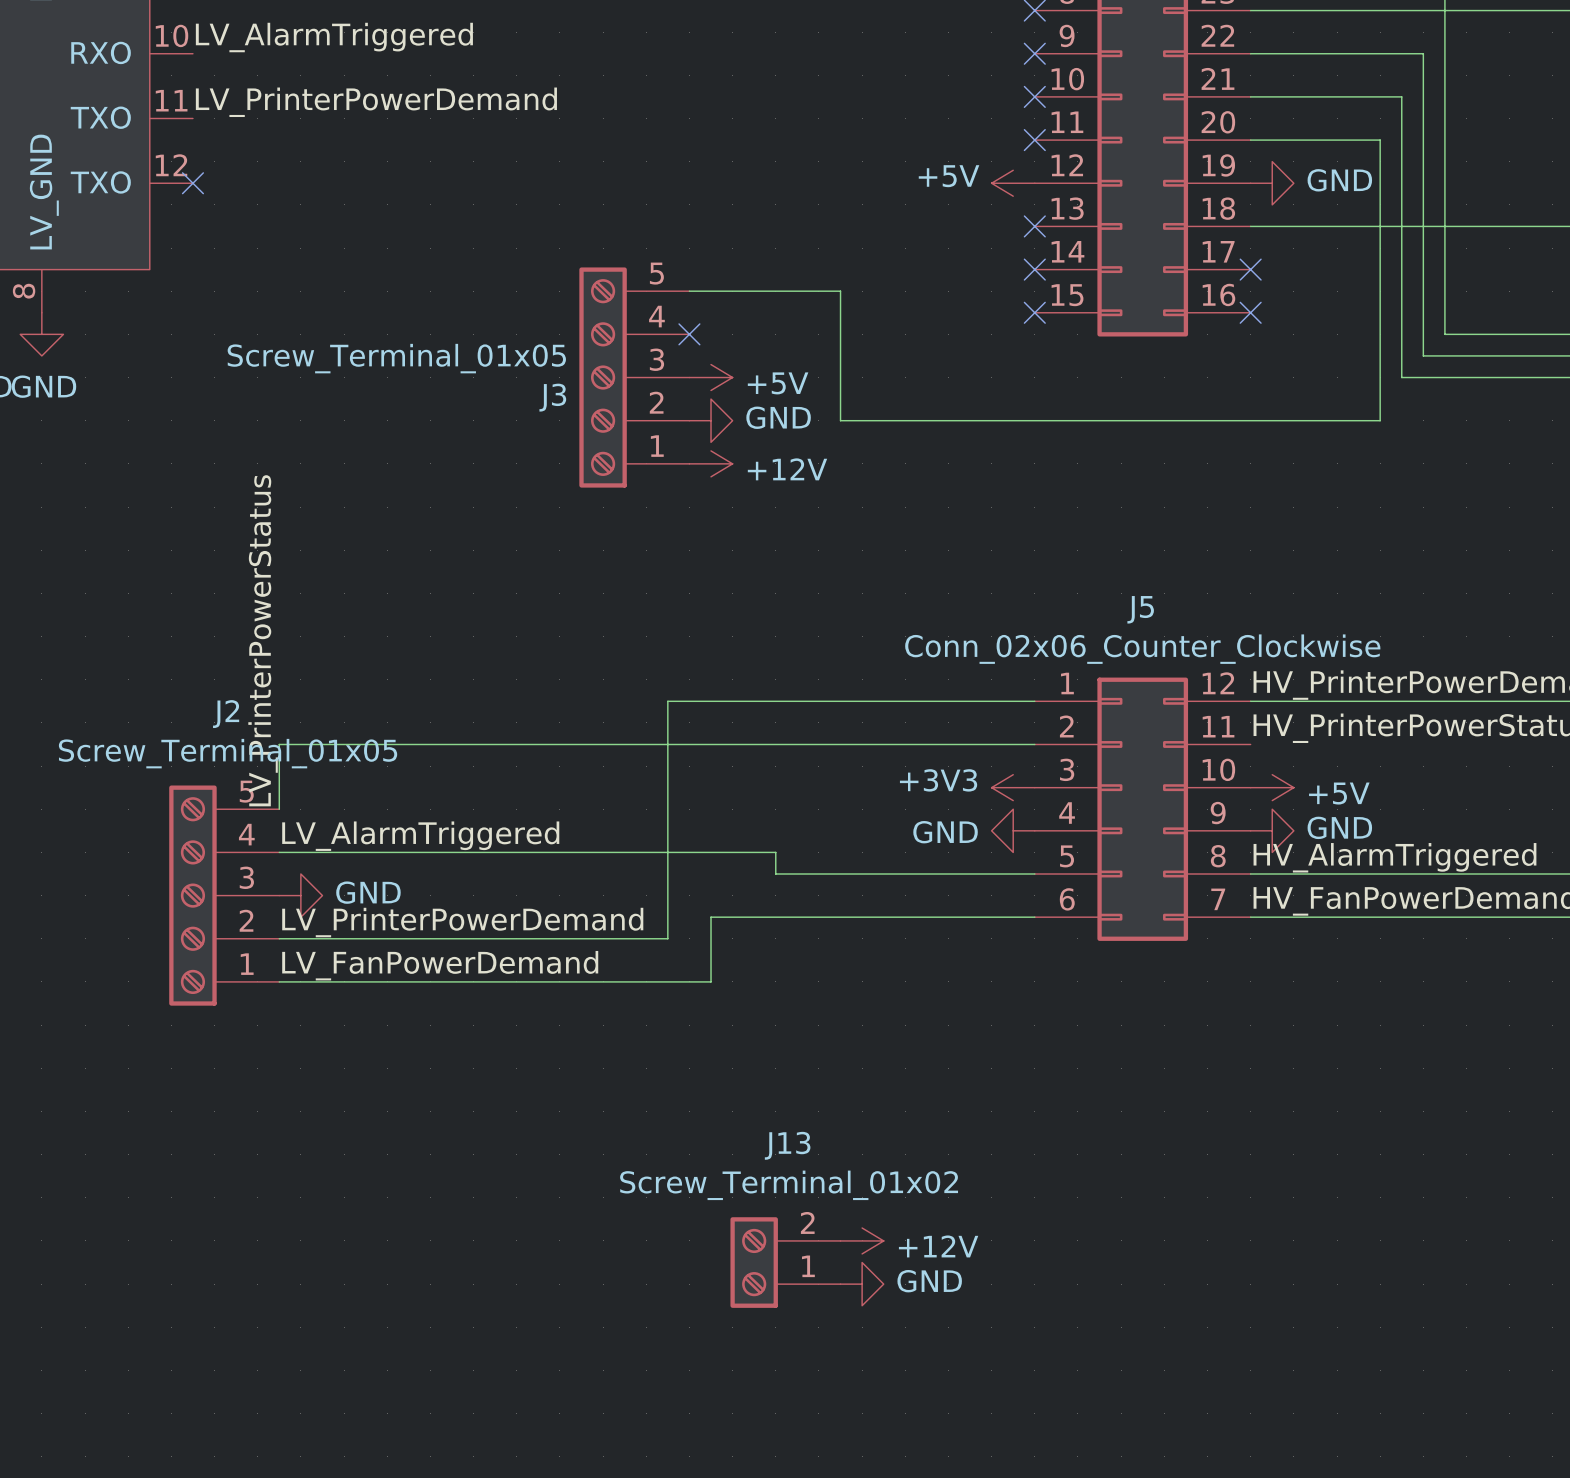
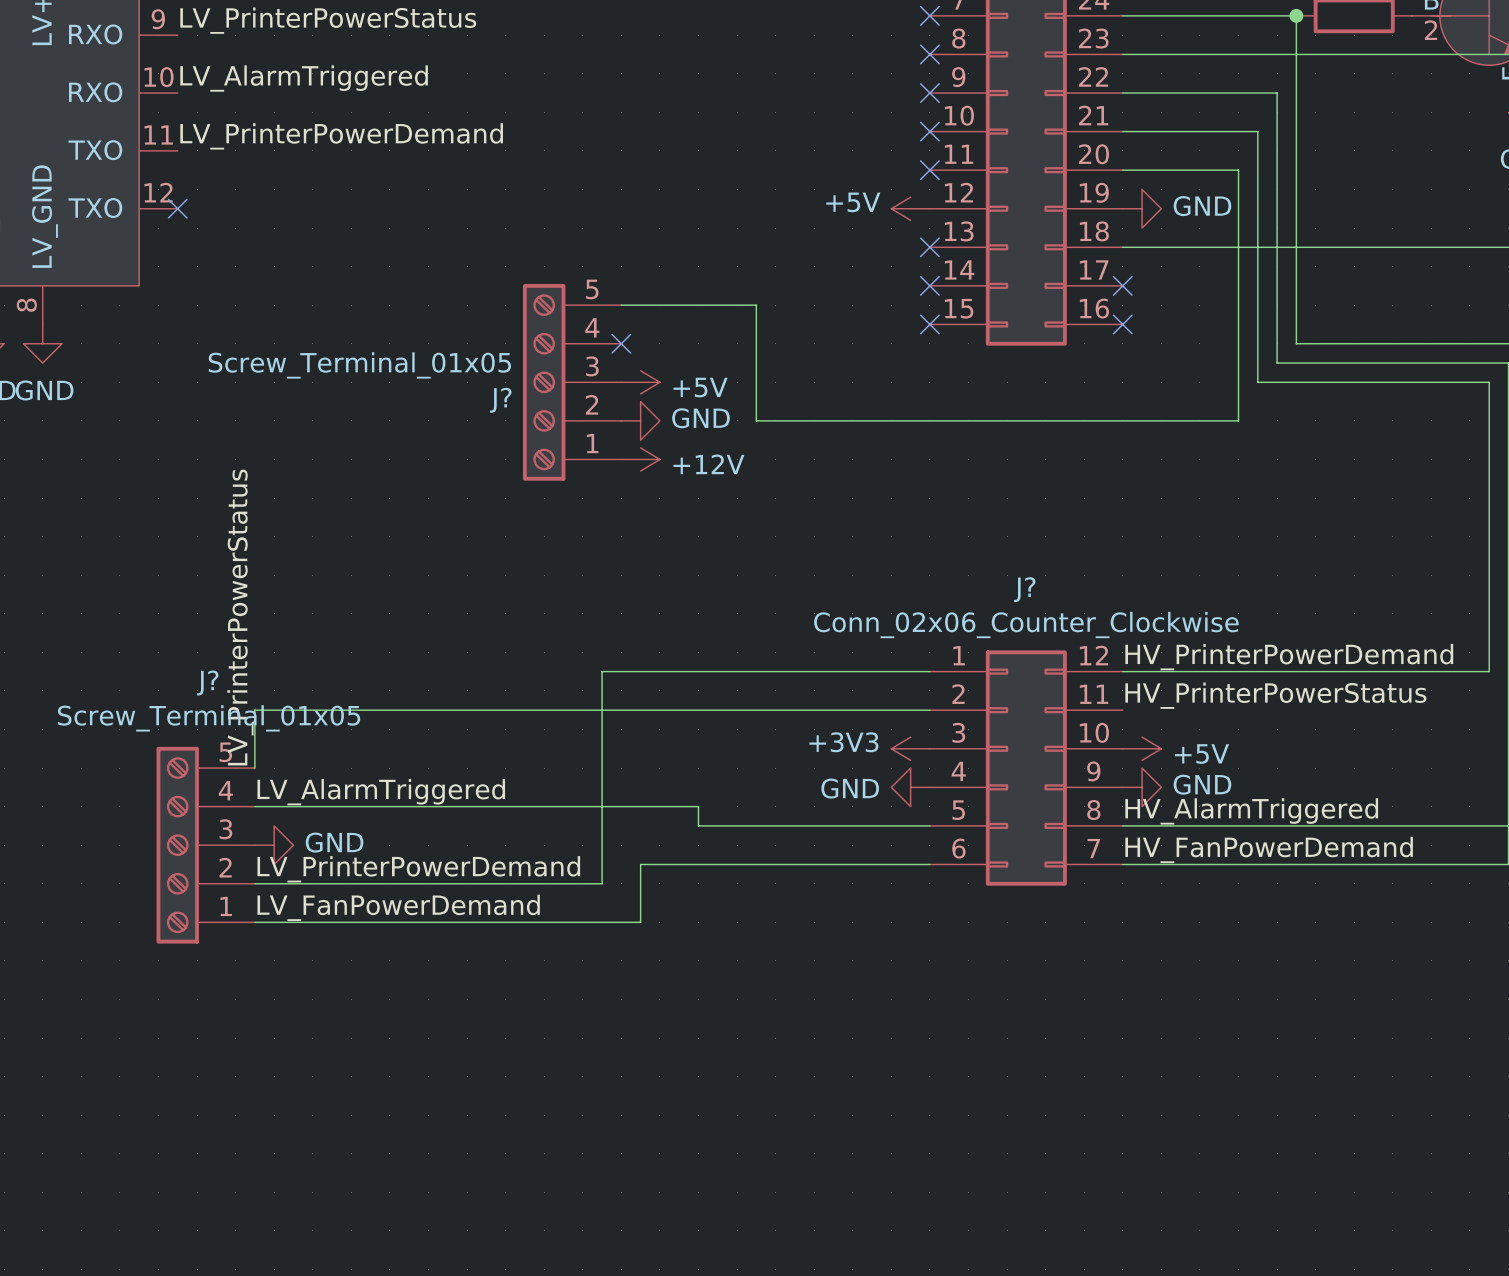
J3 name: J3 (552, 397) -> J? (500, 400)
J5 name: J5 (1140, 609) -> J? (1024, 589)
J2 name: J2 (226, 714) -> J? (207, 683)
power symbol: +12V (862, 1240) -> none
J13: Screw_Terminal_01x02 (785, 1262) -> none
power symbol: GND (862, 1284) -> none

